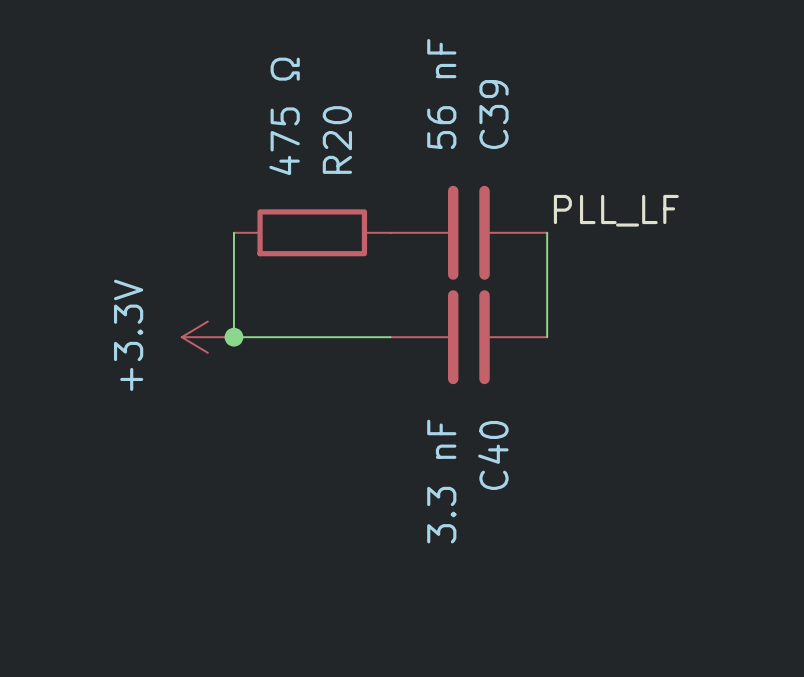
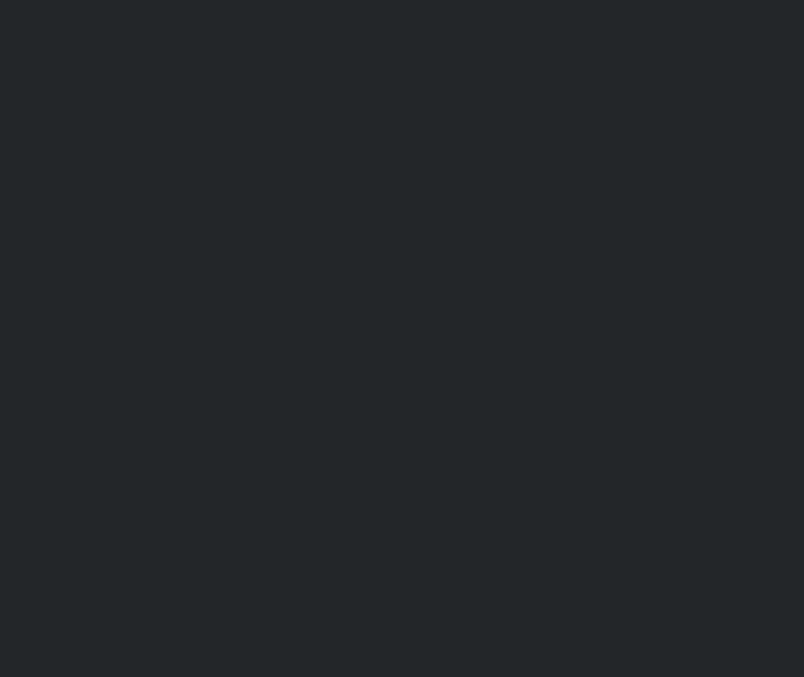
label: PLL_LF (616, 210) -> none
wire: (233, 232) (233, 337) (390, 337) -> none
R20: 475 Ω (312, 232) -> none
C39: 56 nF (468, 232) -> none
wire: (547, 232) (547, 337) -> none
power symbol: +3.3V (207, 337) -> none
junction: (233, 337) -> none
C40: 3.3 nF (468, 337) -> none

